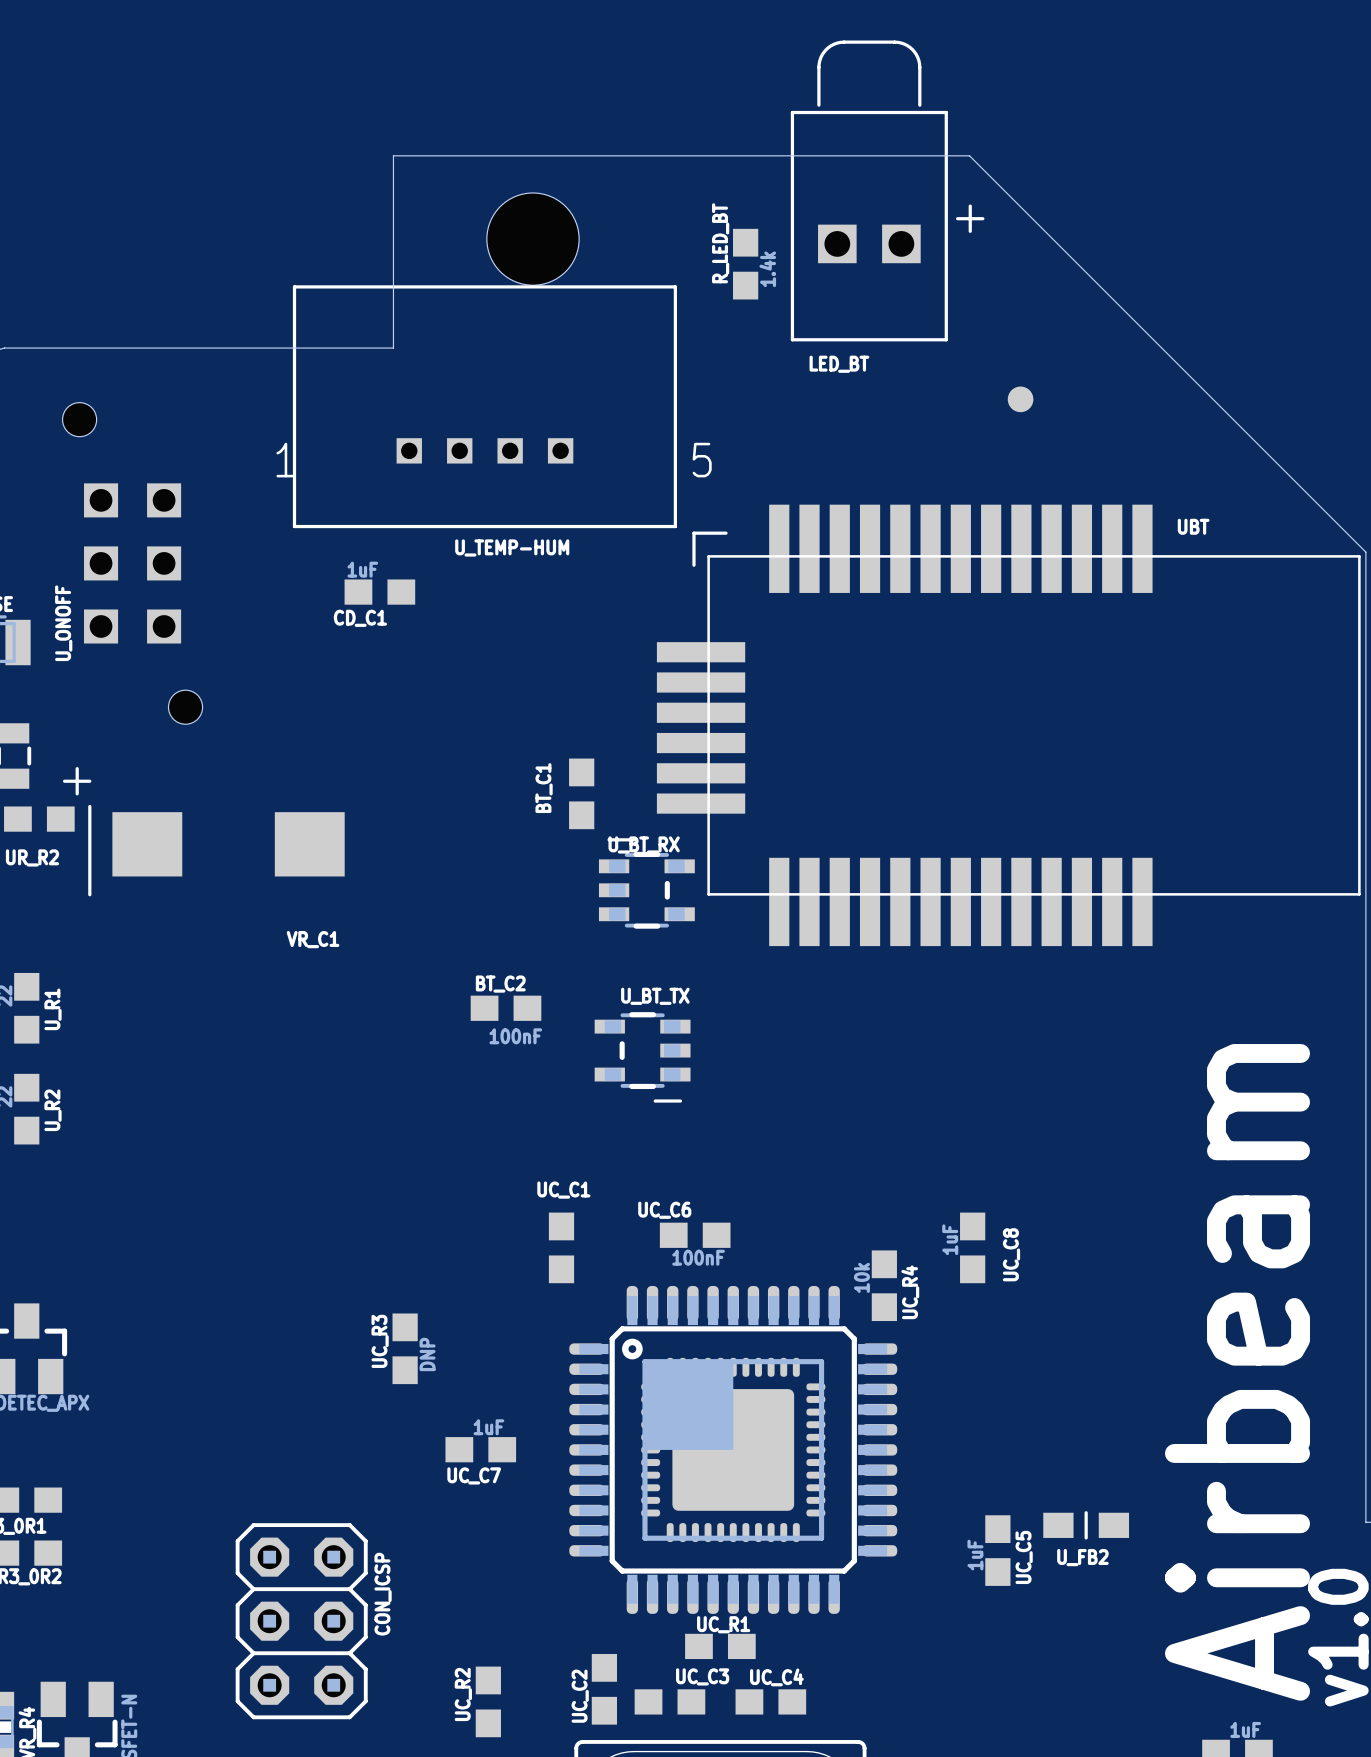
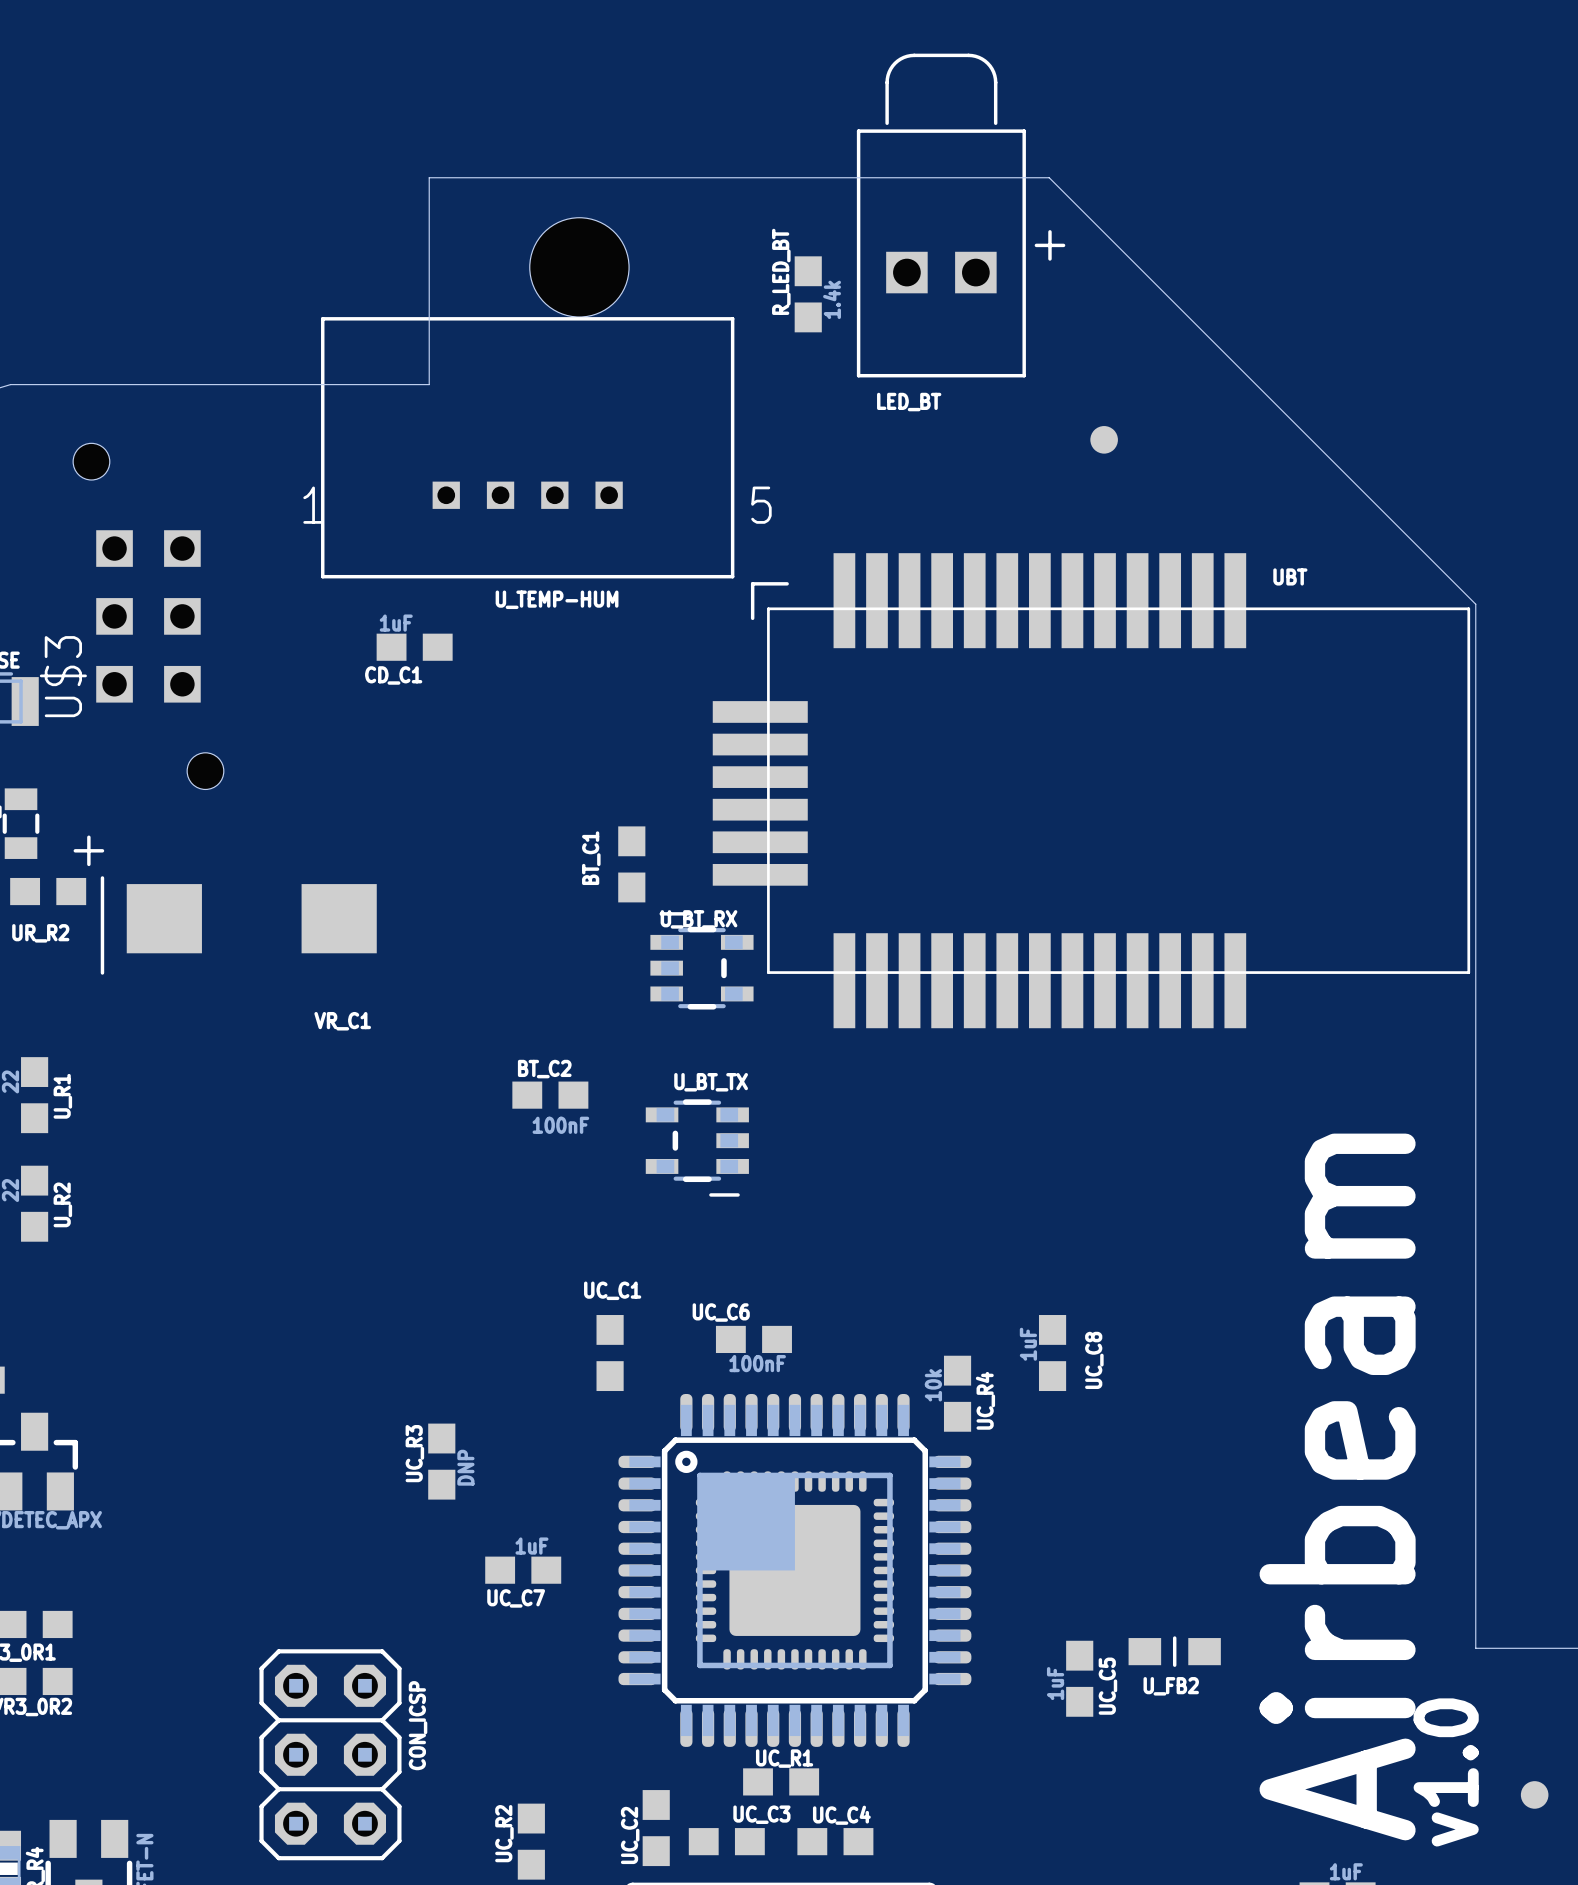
U_ONOFF name: U_ONOFF (63, 623) -> U$3 (63, 676)

